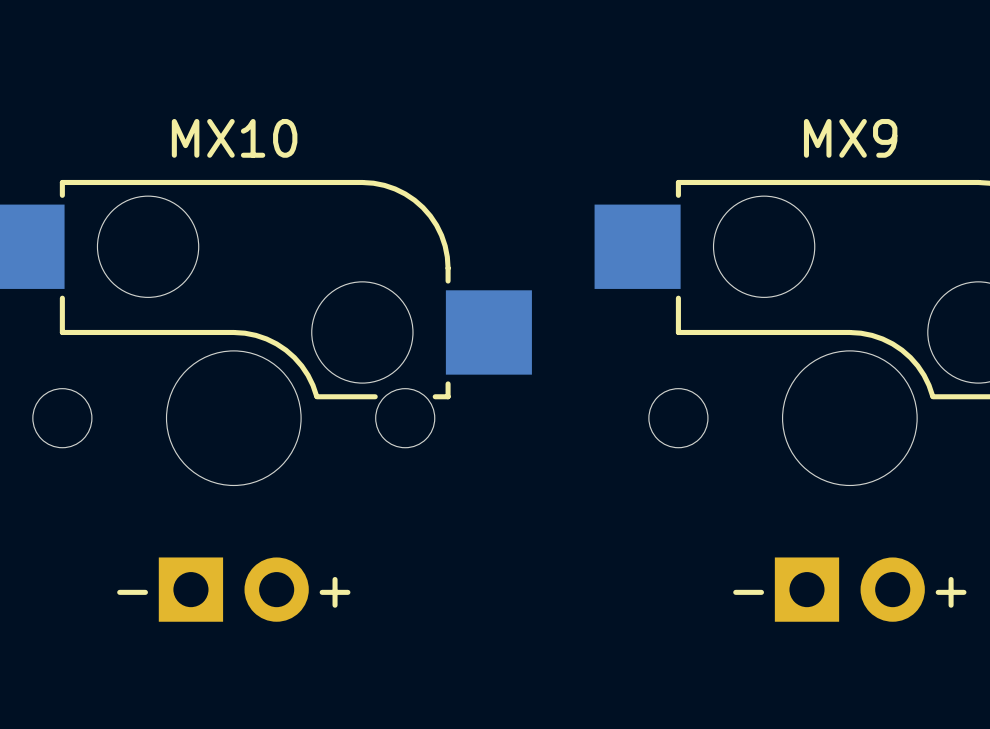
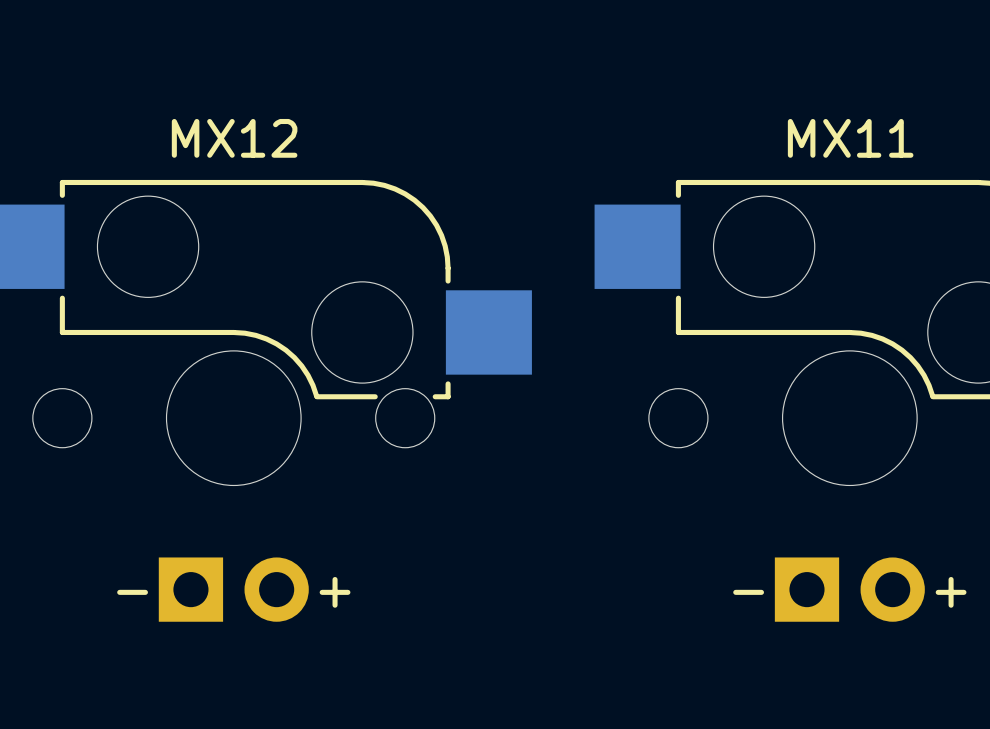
MX10 name: MX10 (234, 138) -> MX12 (234, 138)
MX9 name: MX9 (850, 138) -> MX11 (850, 138)

